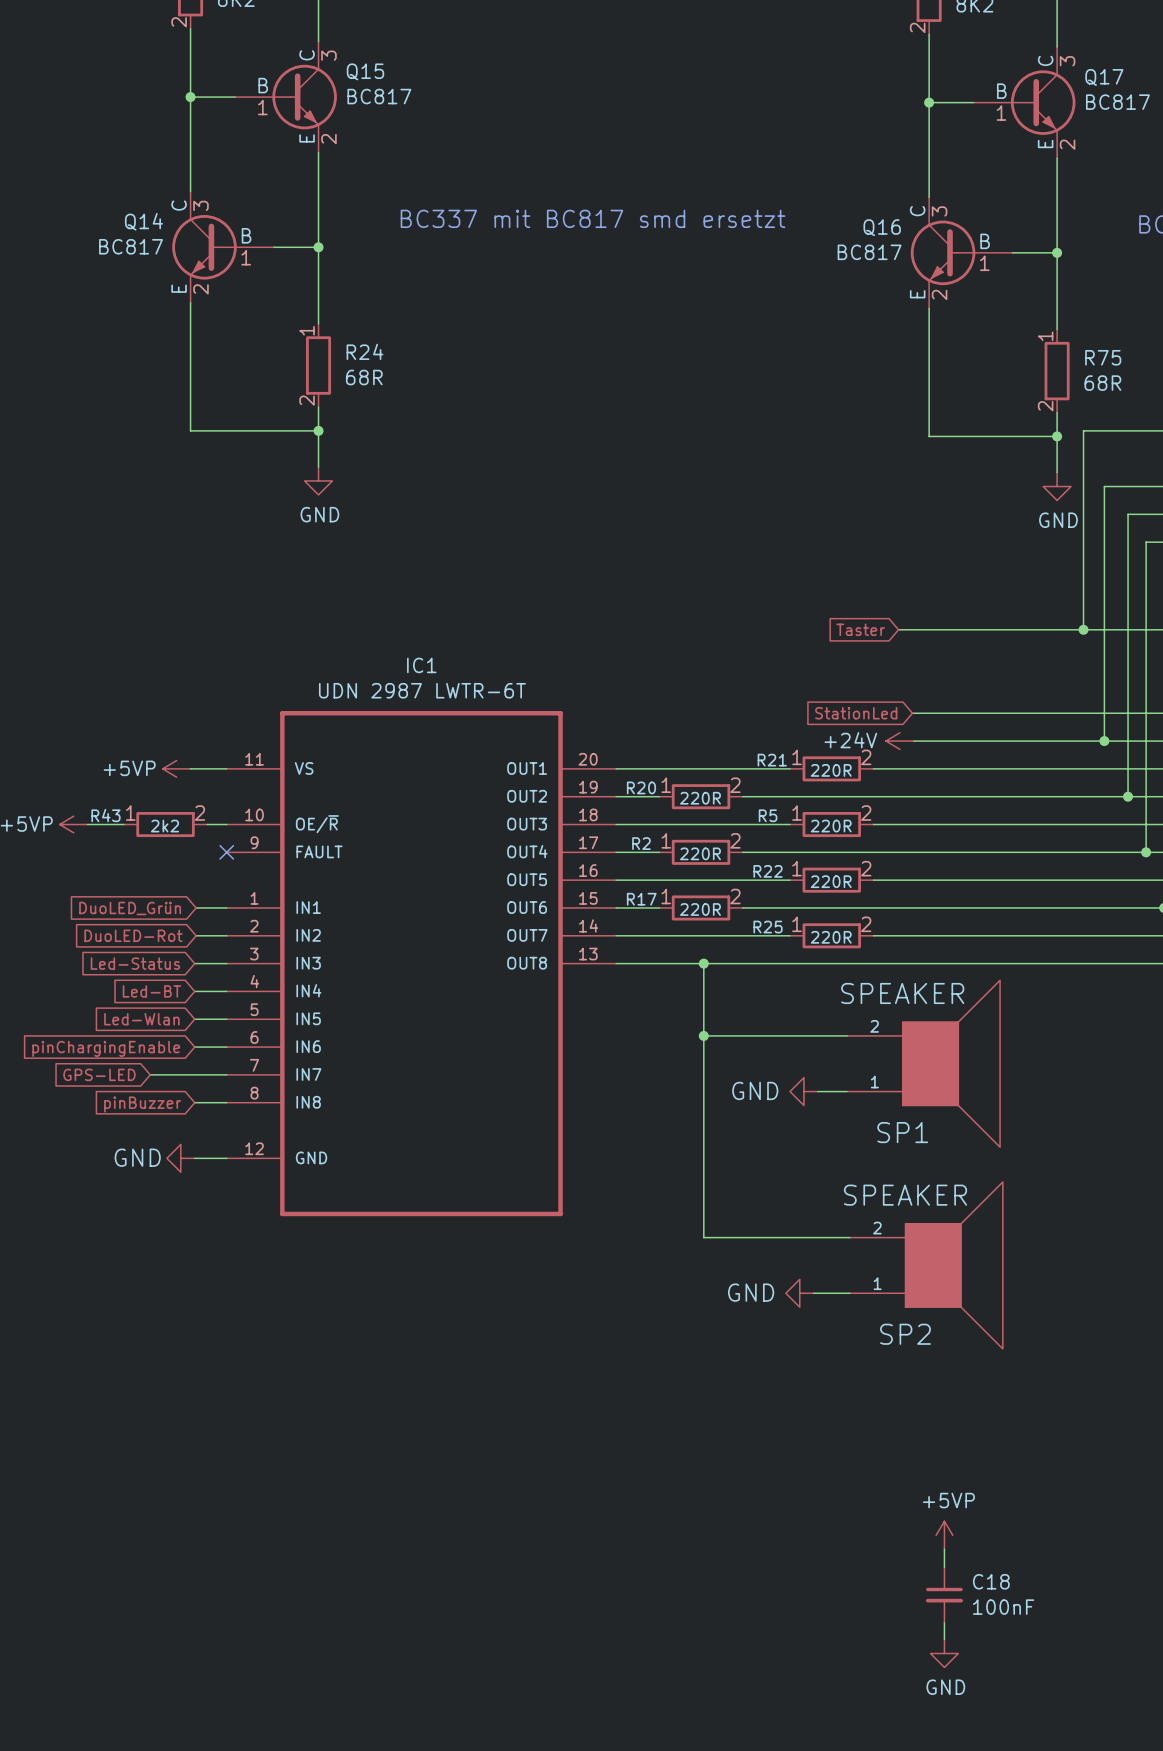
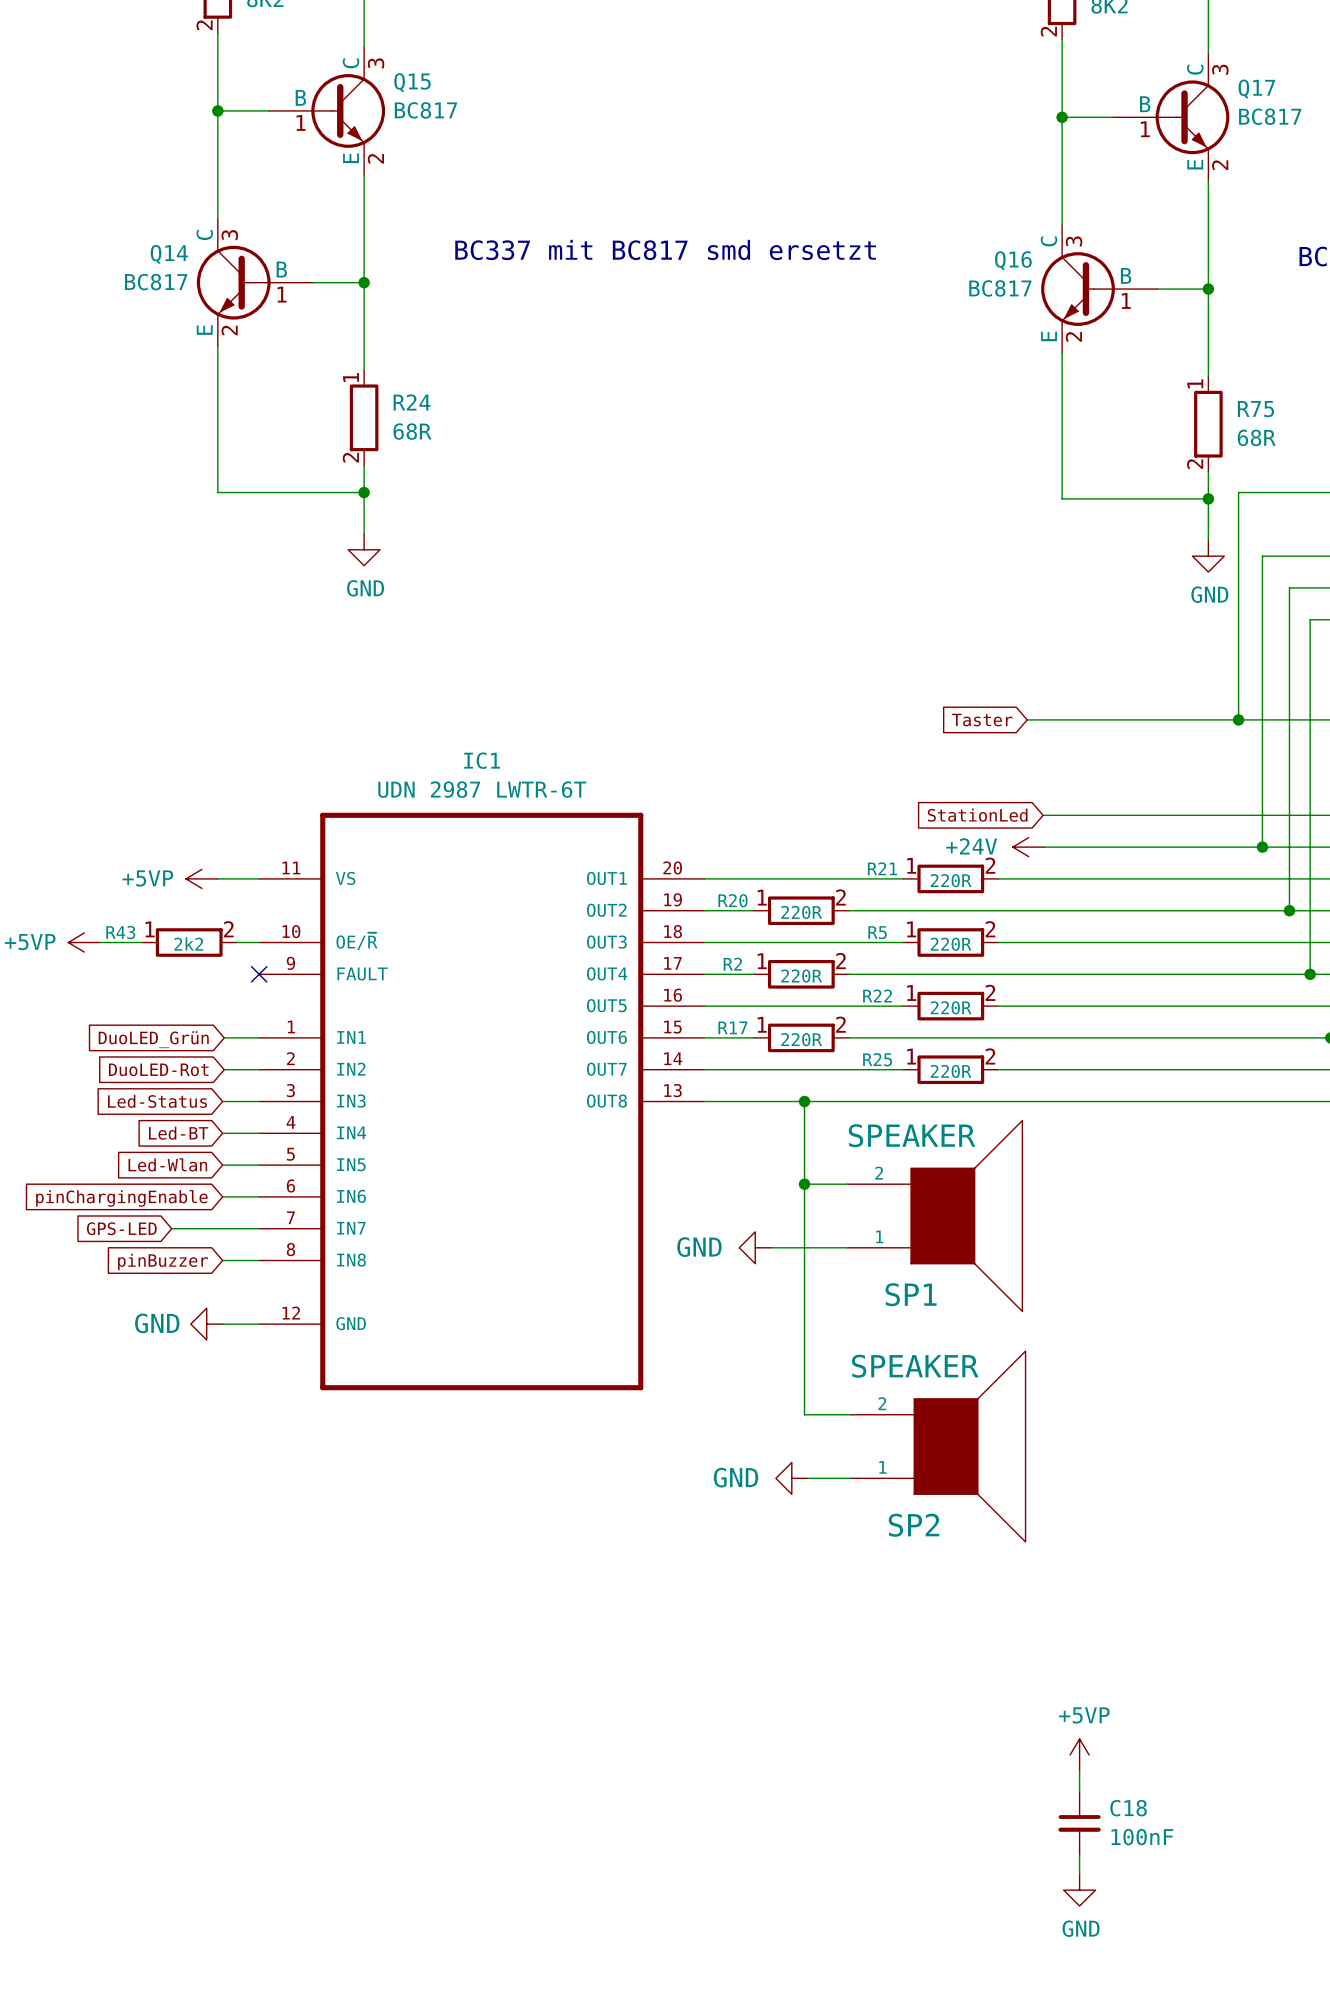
SP1 position: (923, 1063) -> (934, 1215)
power symbol: none -> GND (755, 1247)
wire: none -> (771, 1247) (847, 1247)
power symbol: GND (803, 1091) -> none
SP2 position: (926, 1265) -> (938, 1446)
wire: none -> (807, 1478) (850, 1478)
power symbol position: GND (799, 1293) -> GND (791, 1478)

